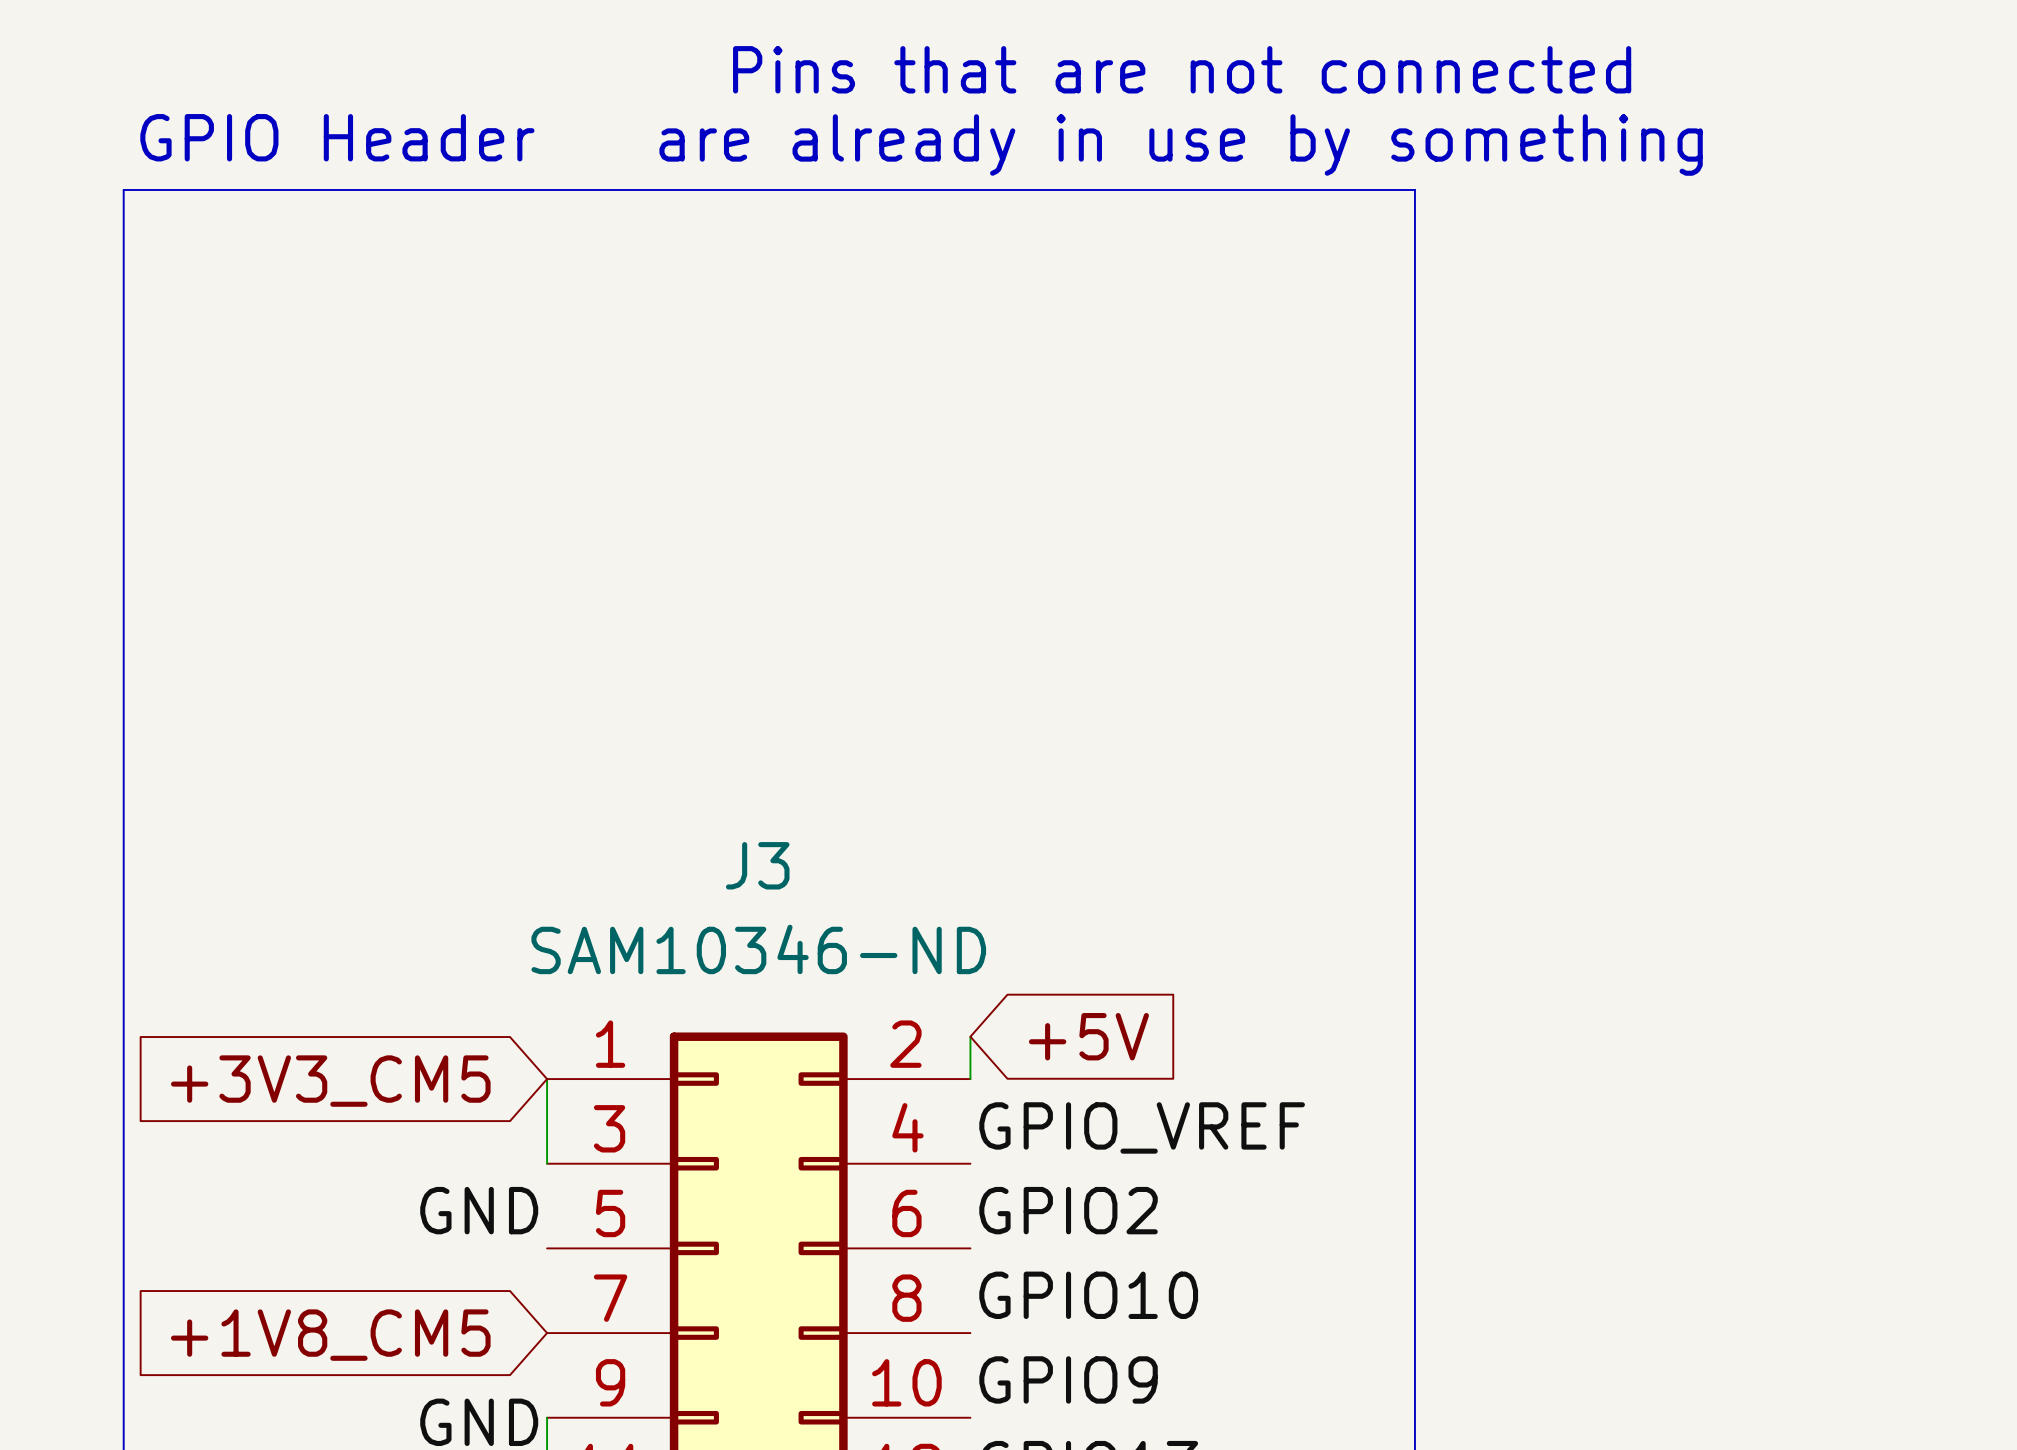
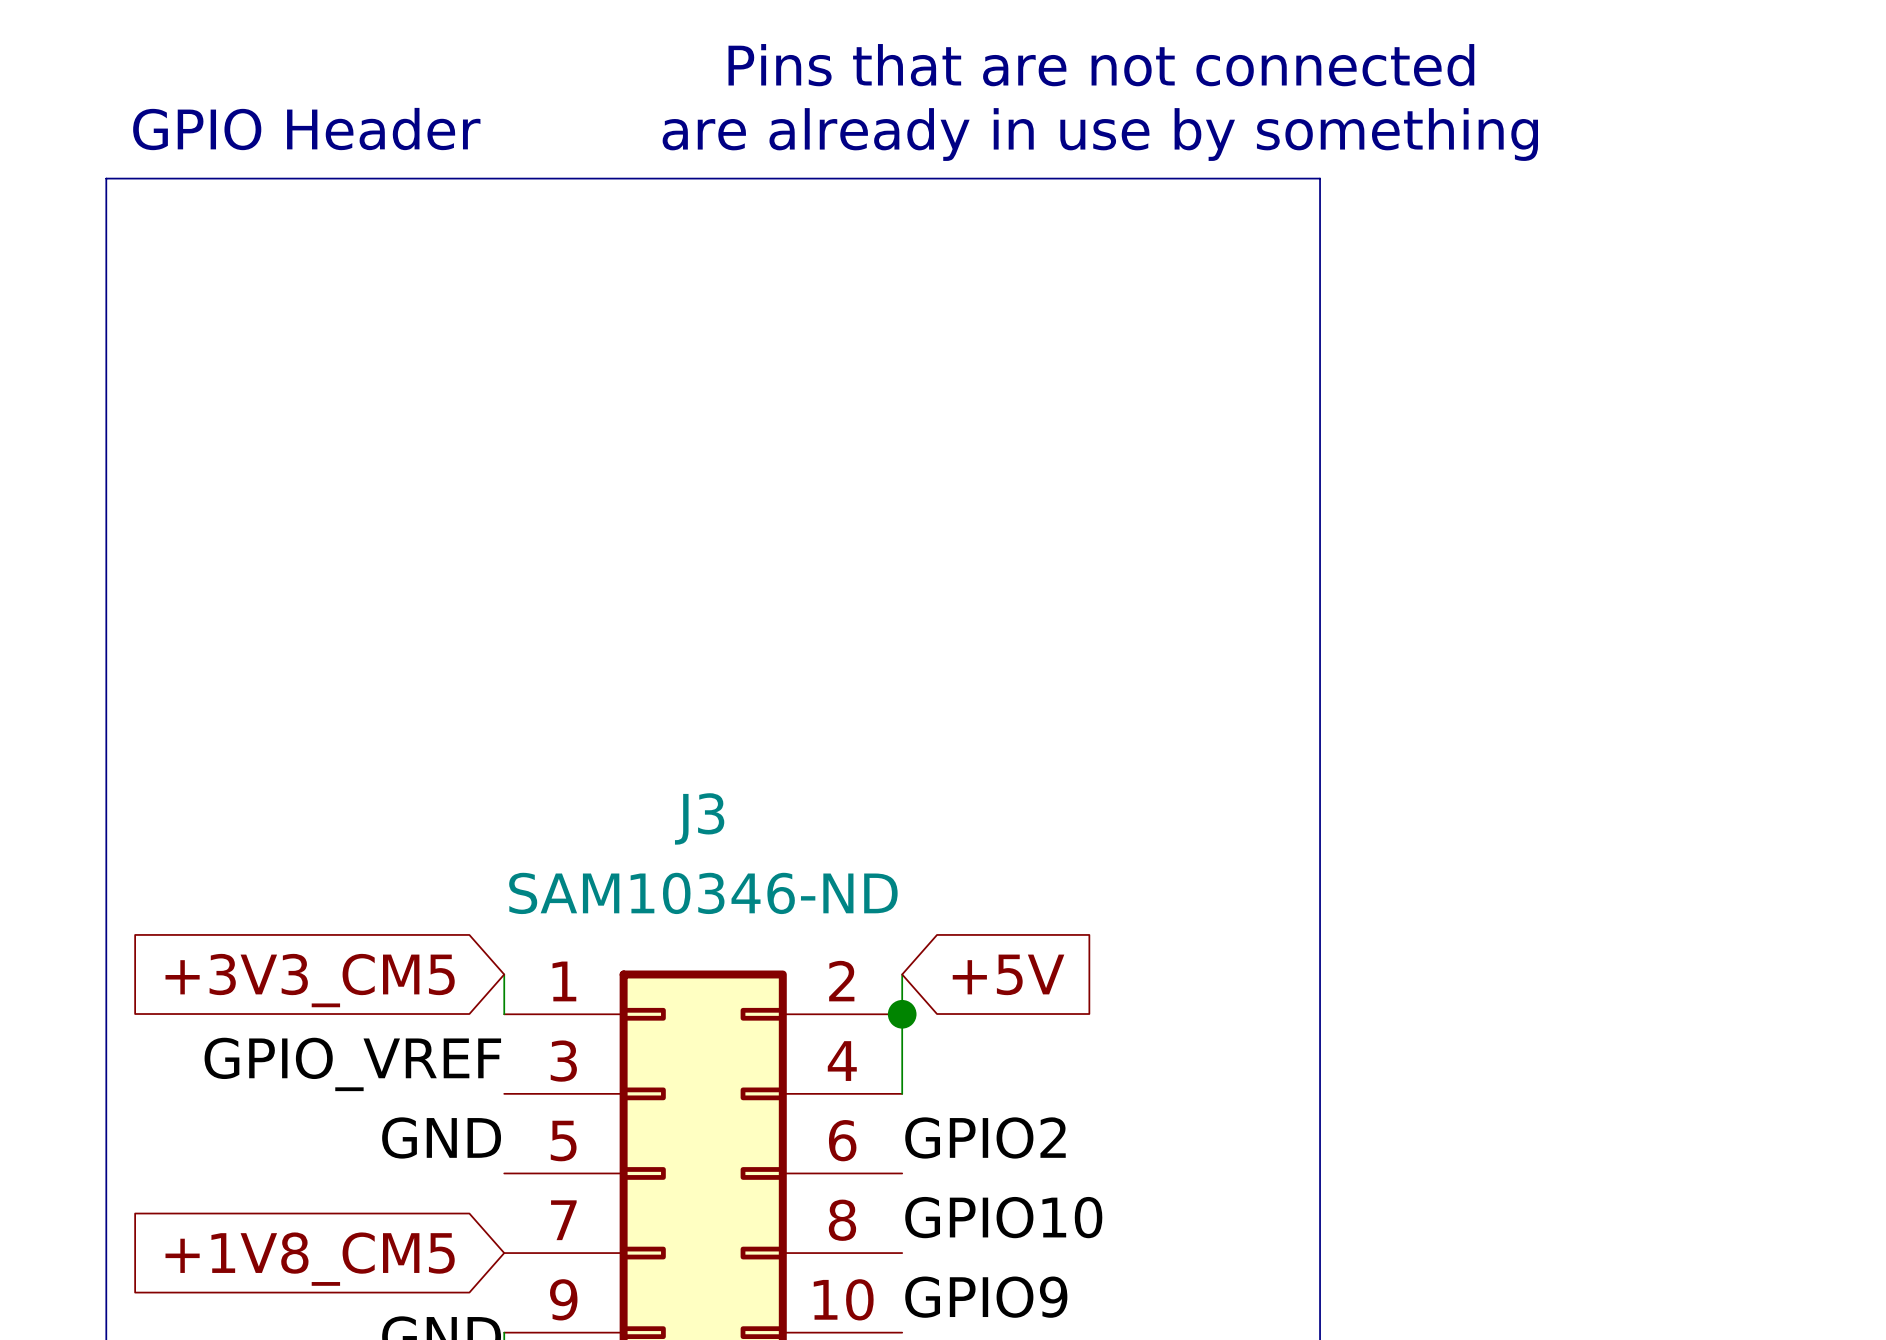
wire: (547, 1079) (547, 1163) -> (504, 1014) (504, 974)
wire: none -> (902, 1014) (902, 1093)
junction: none -> (902, 1014)
global label position: +3V3_CM5 (330, 1081) -> +3V3_CM5 (310, 980)
label position: GPIO_VREF (1142, 1127) -> GPIO_VREF (352, 1064)

